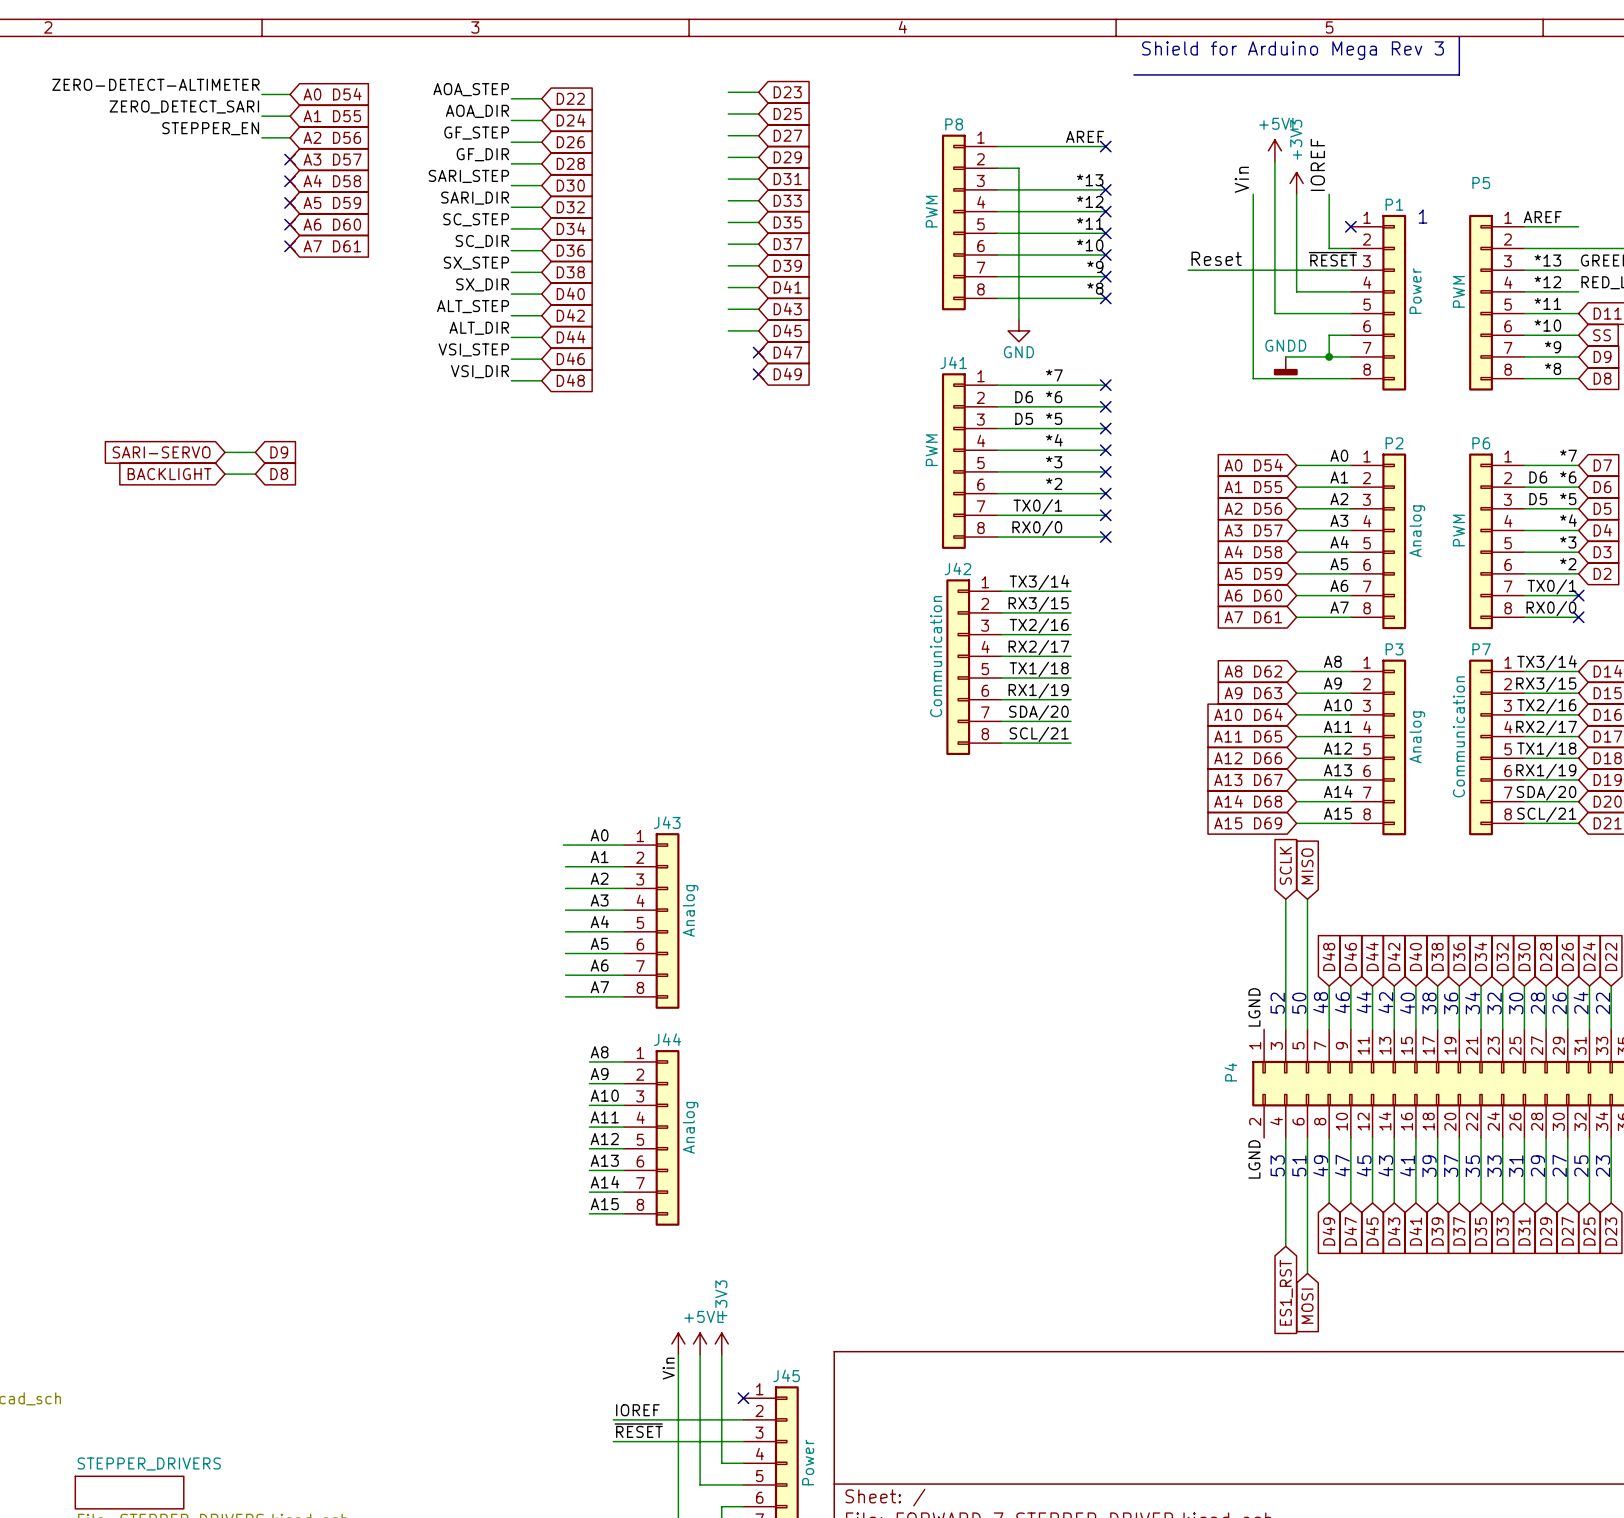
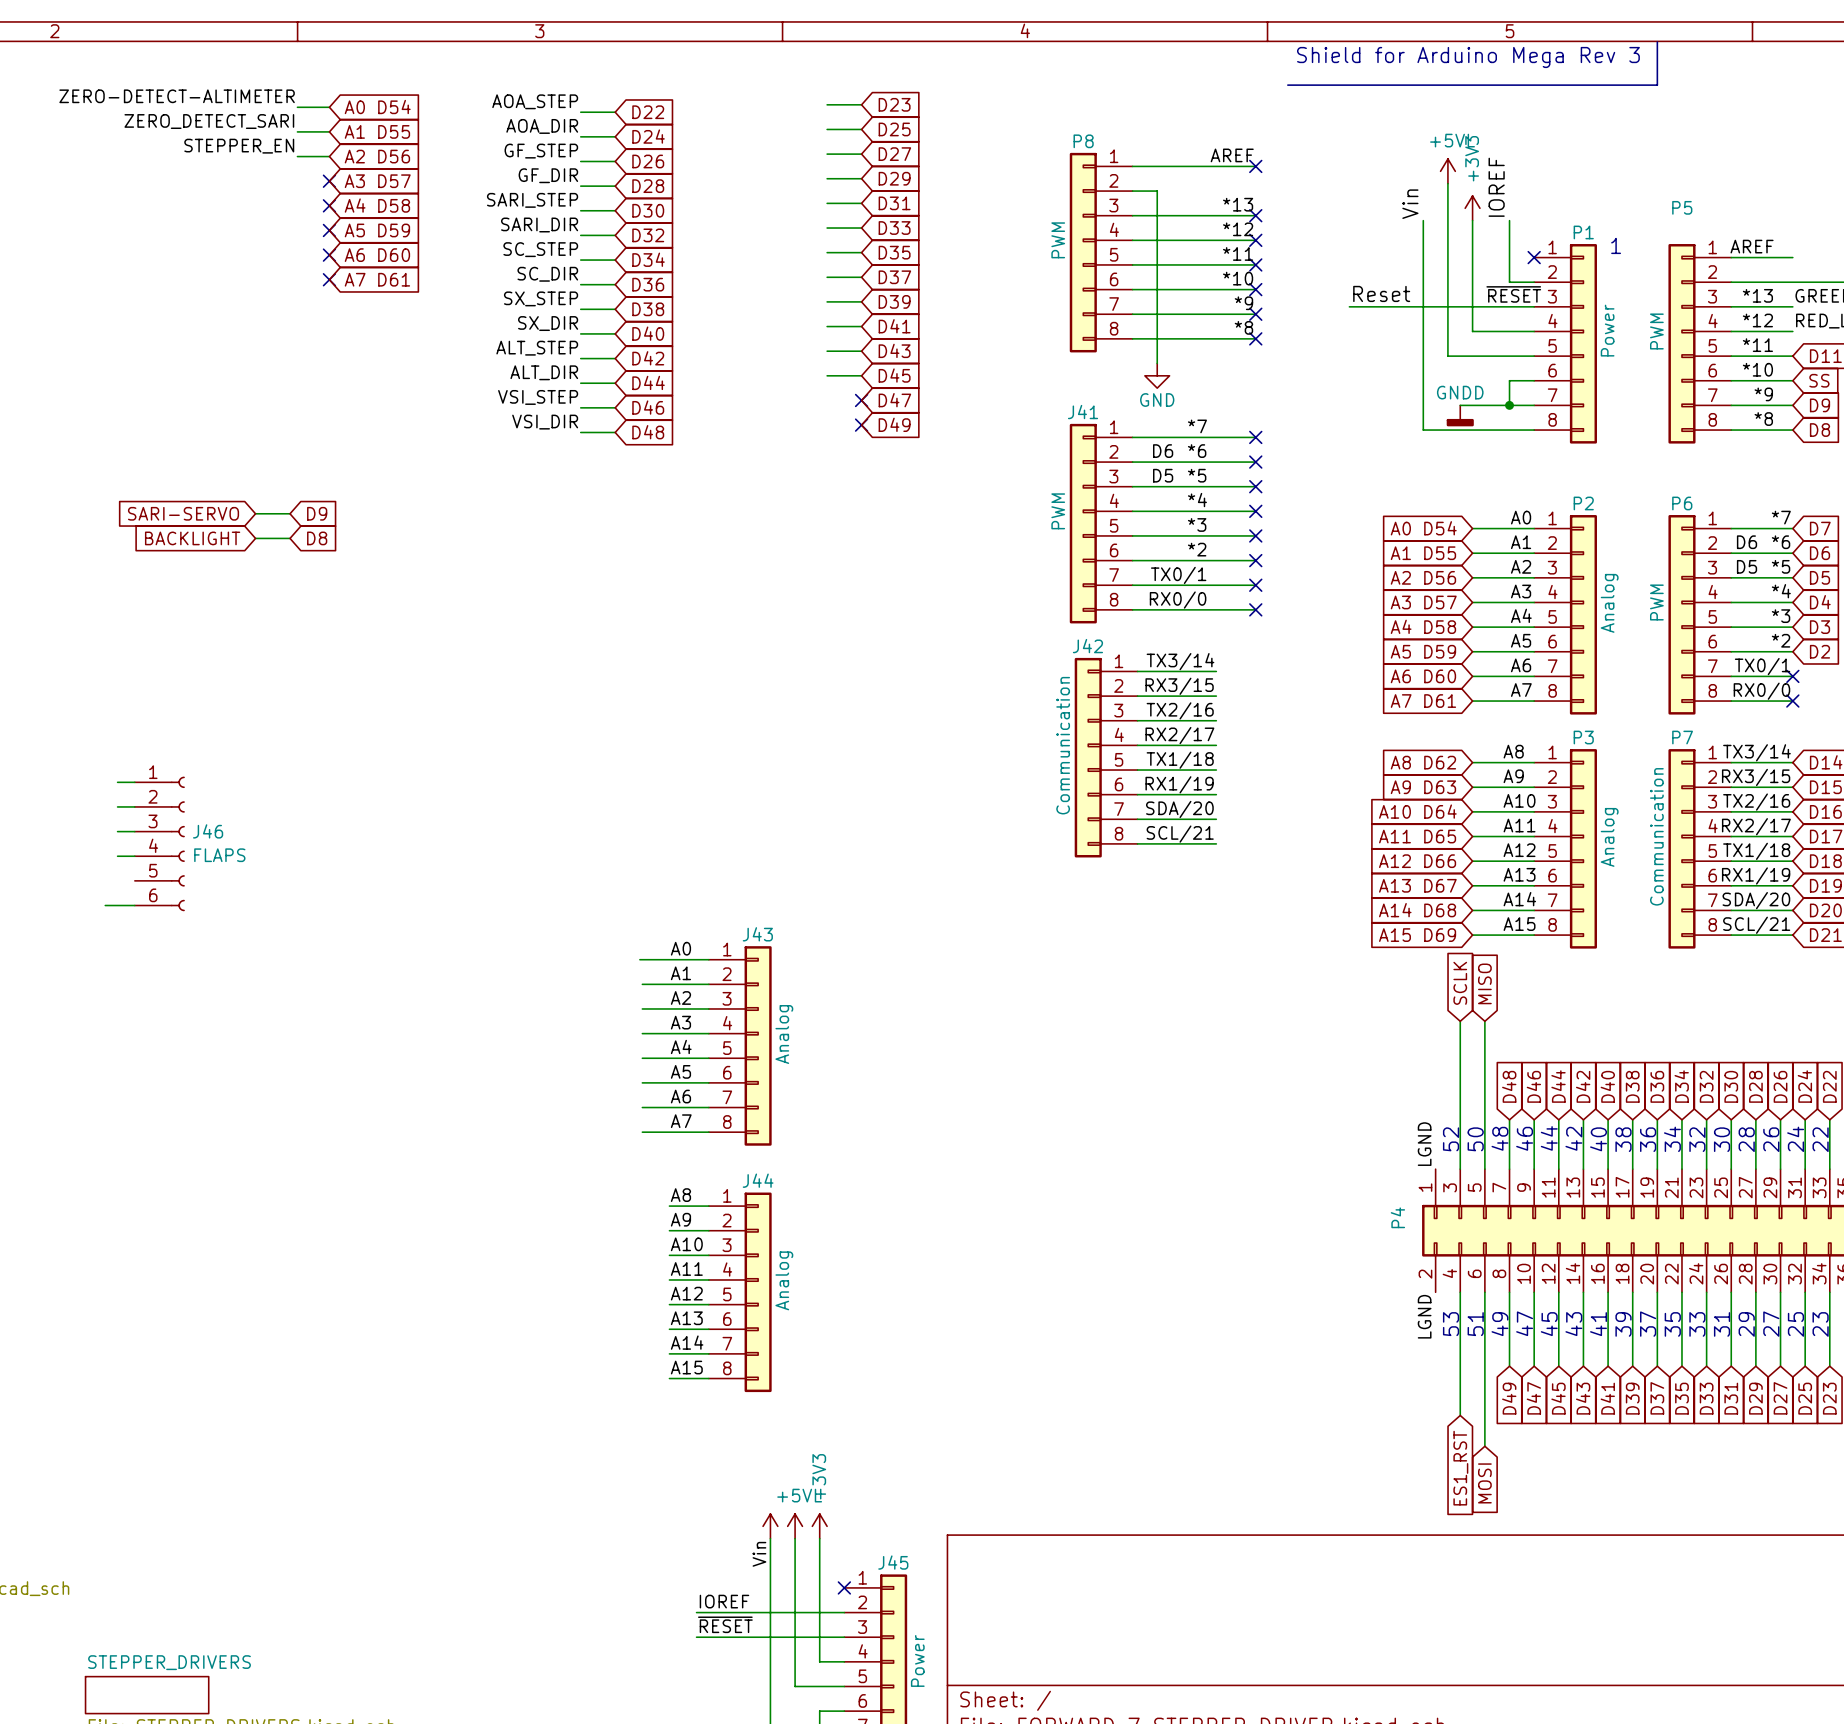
wire: none -> (117, 782) (134, 782)
wire: none -> (117, 806) (134, 806)
wire: none -> (117, 831) (134, 831)
J46: none -> FLAPS (159, 843)
wire: none -> (117, 856) (134, 856)
wire: none -> (105, 905) (134, 905)

